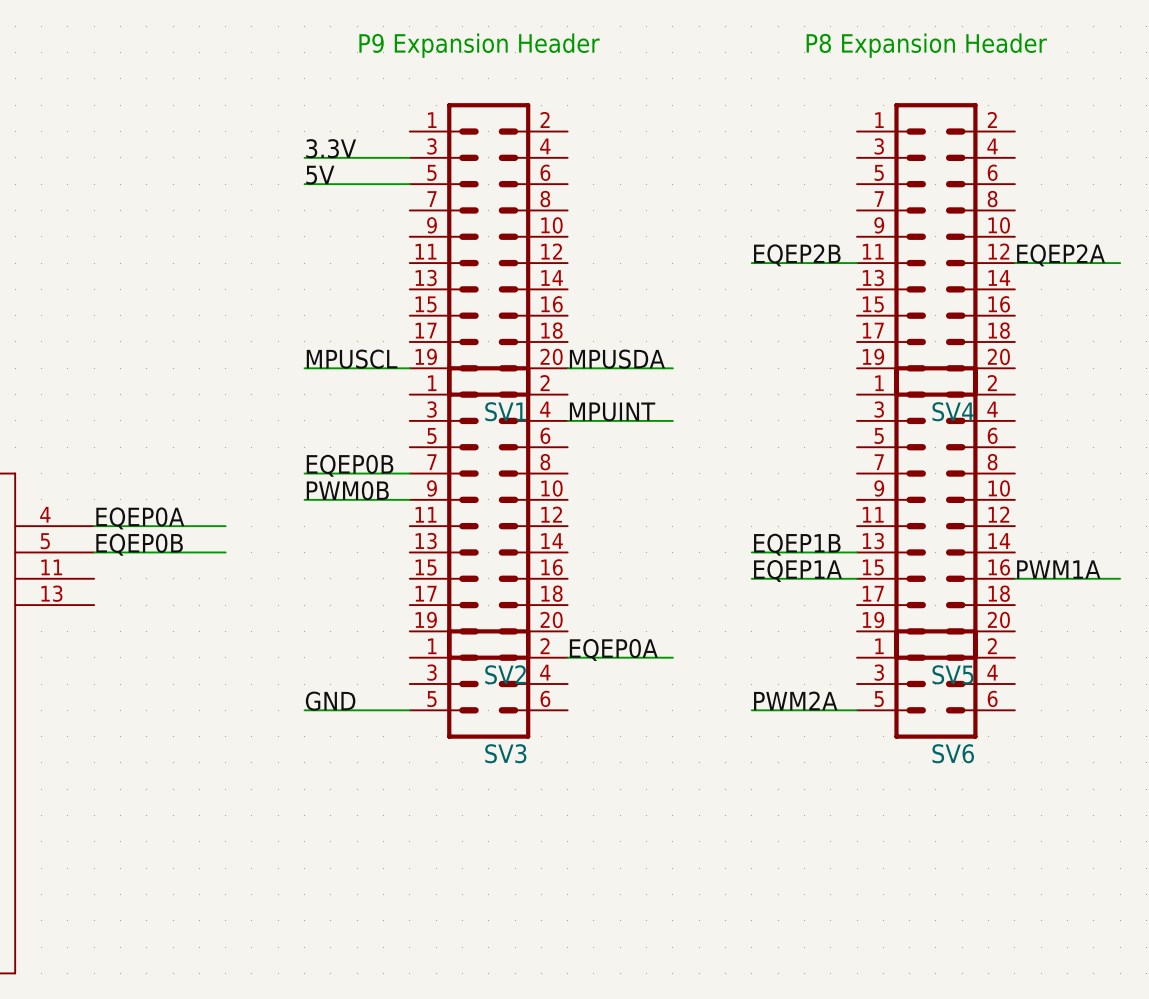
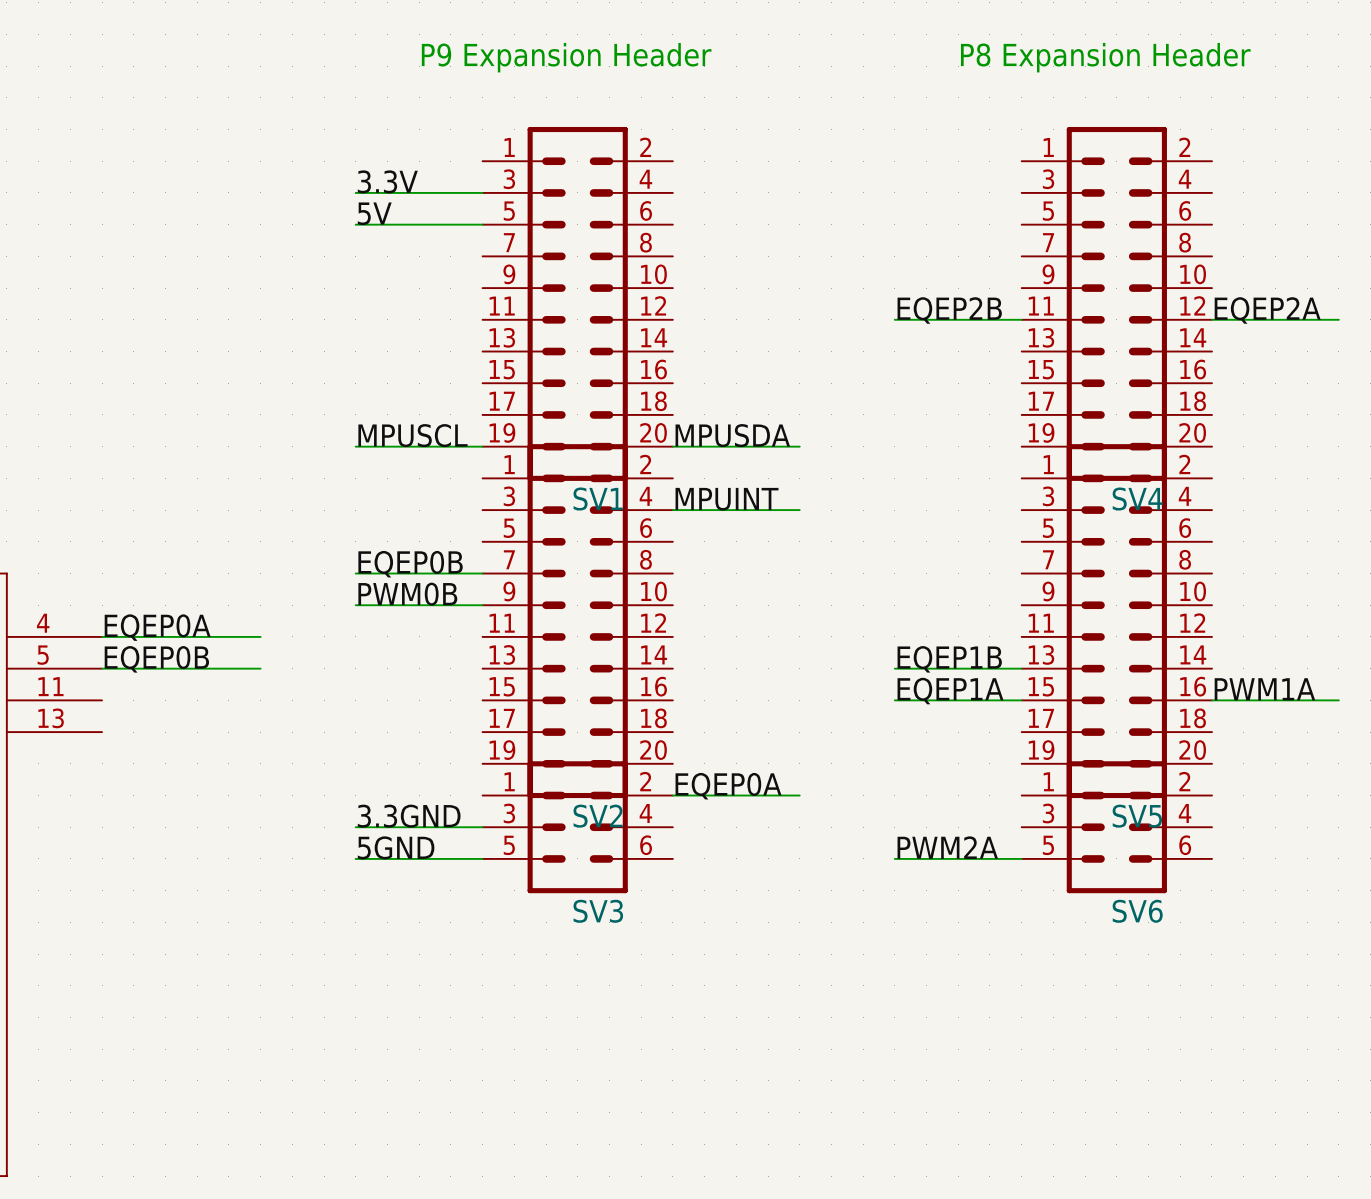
label: none -> 3.3GND (409, 816)
wire: none -> (355, 827) (482, 827)
label: GND (330, 701) -> 5GND (396, 847)

